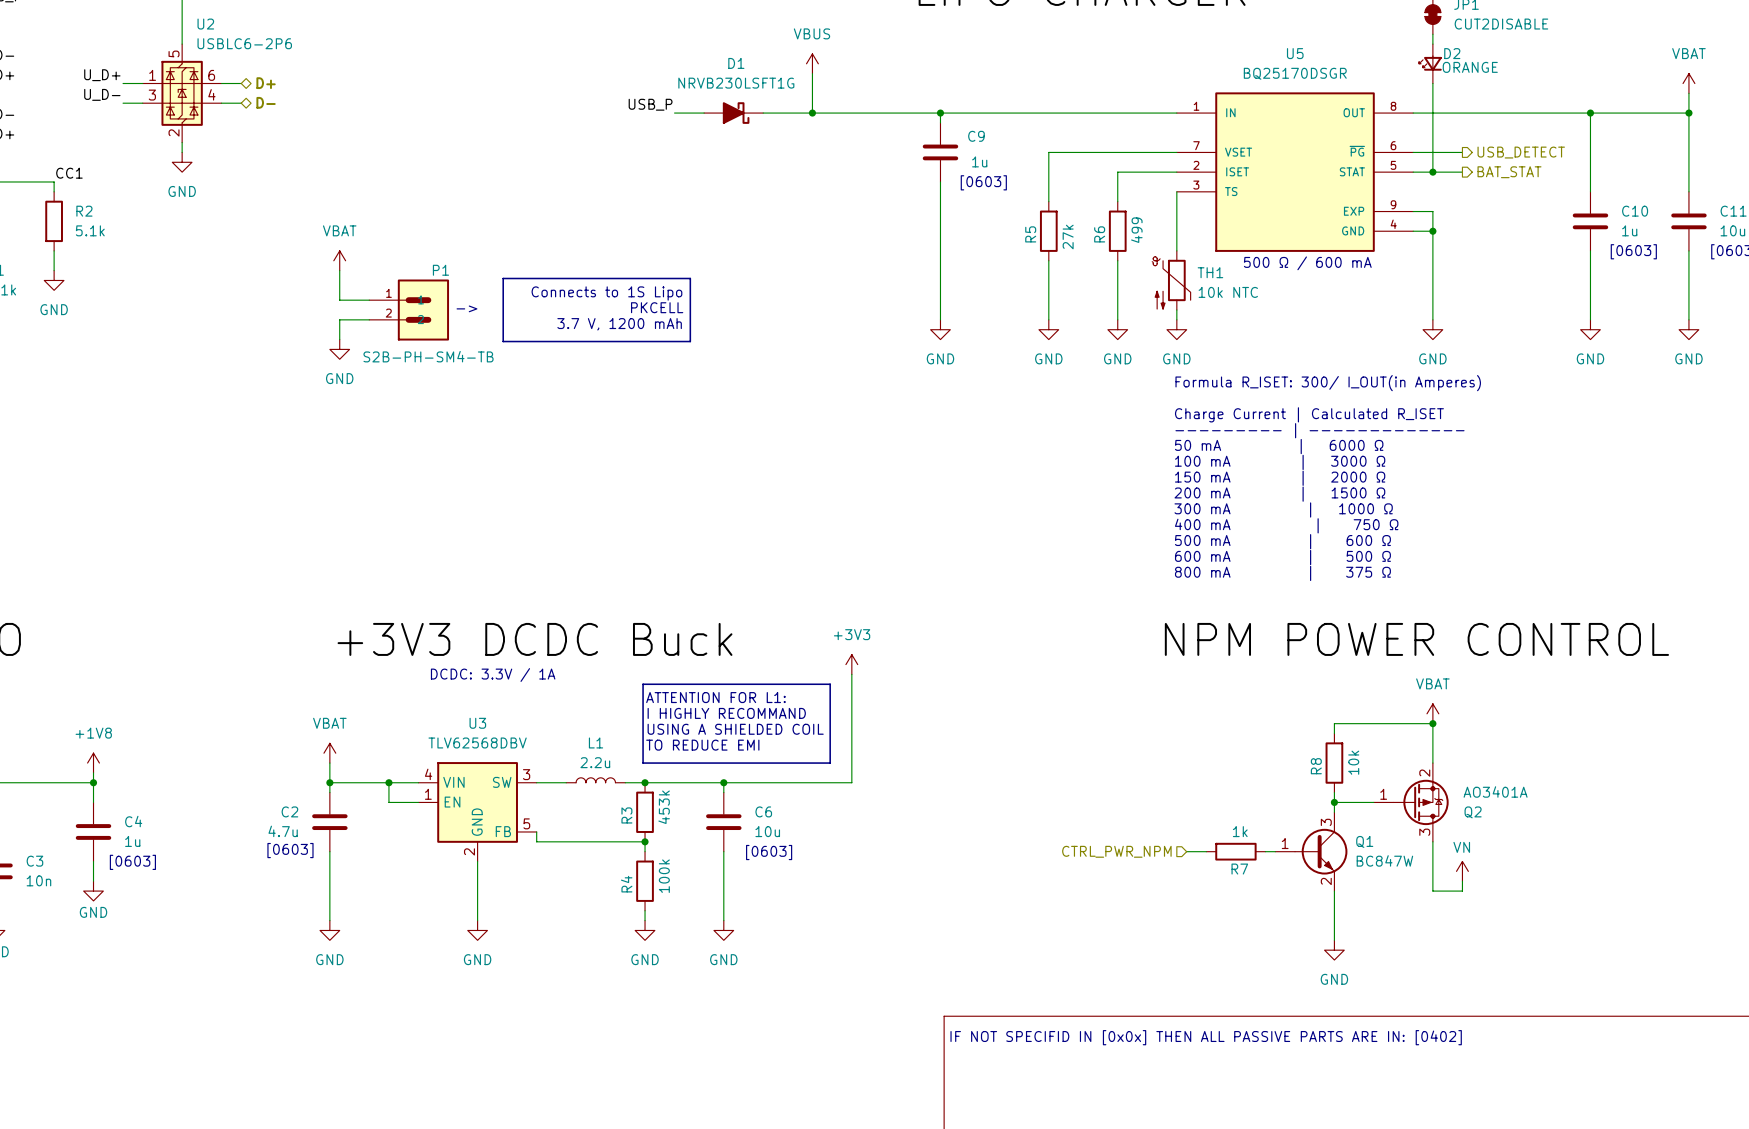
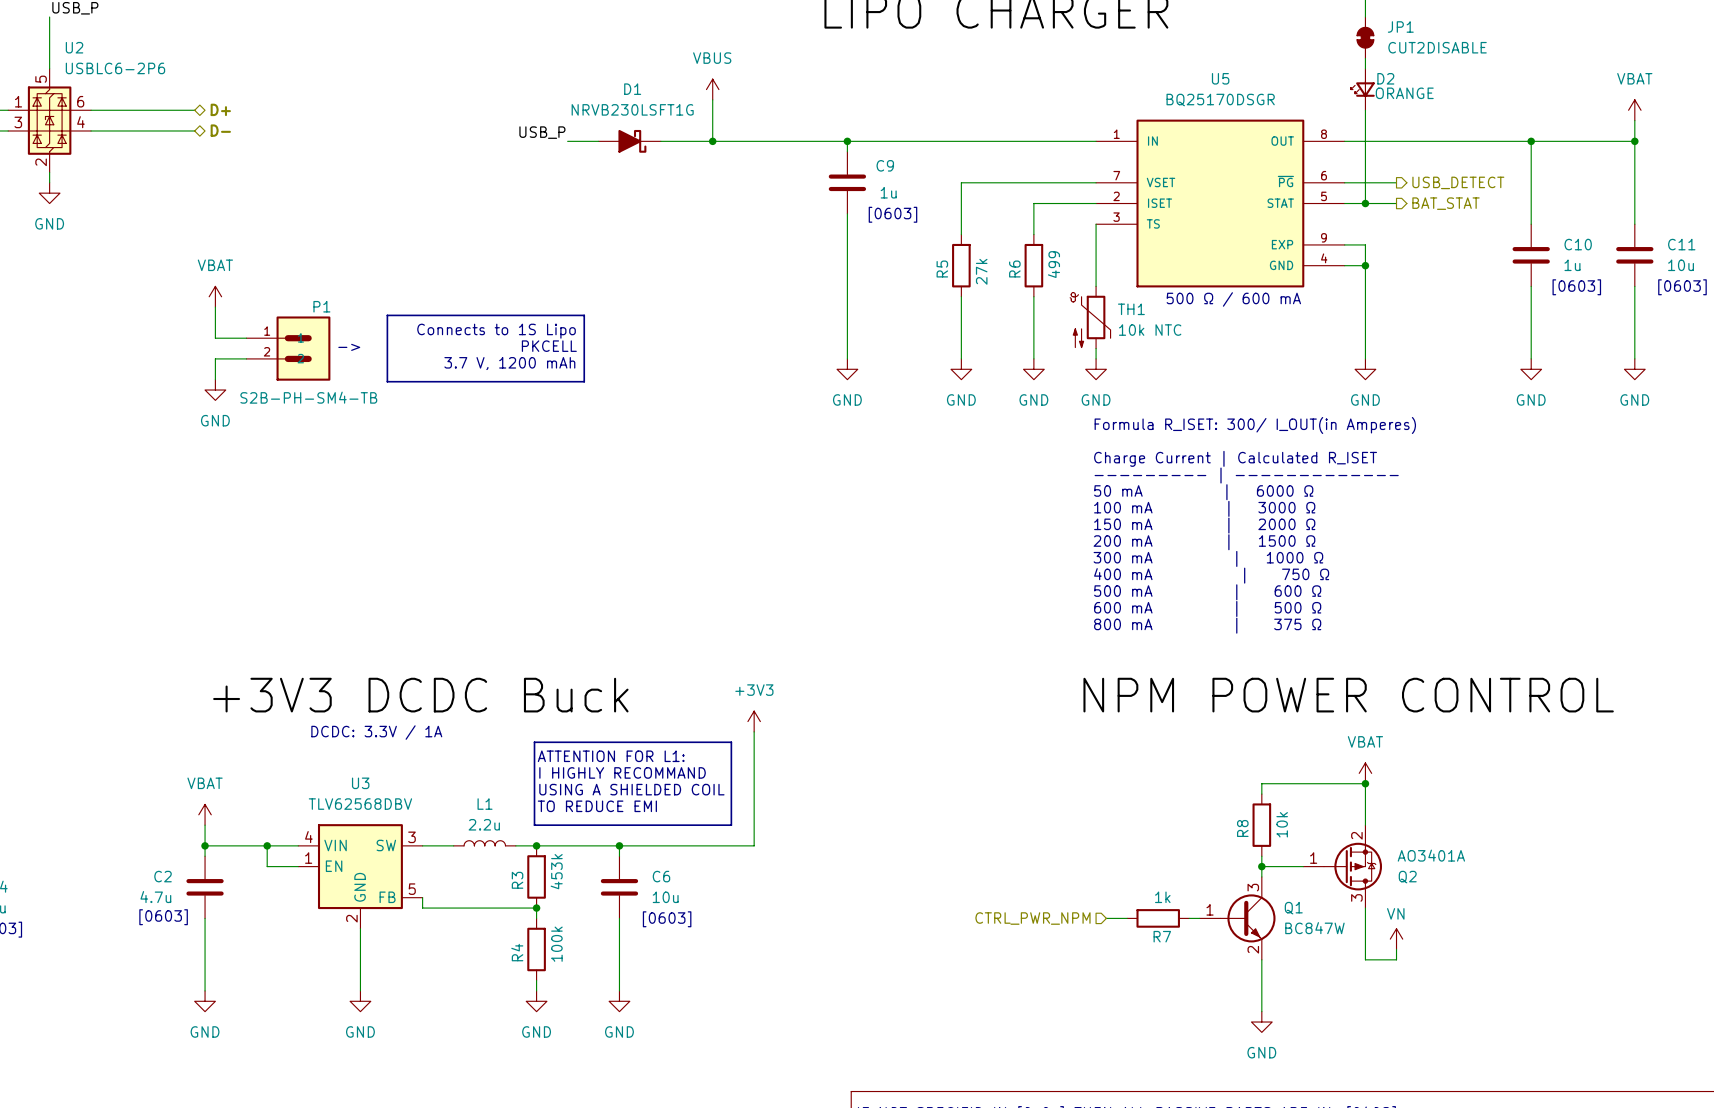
wire: none -> (111, 110) (194, 110)
hierarchical label position: D+ (266, 83) -> D+ (220, 109)
hierarchical label position: D- (266, 102) -> D- (220, 130)
wire: none -> (111, 130) (194, 130)

